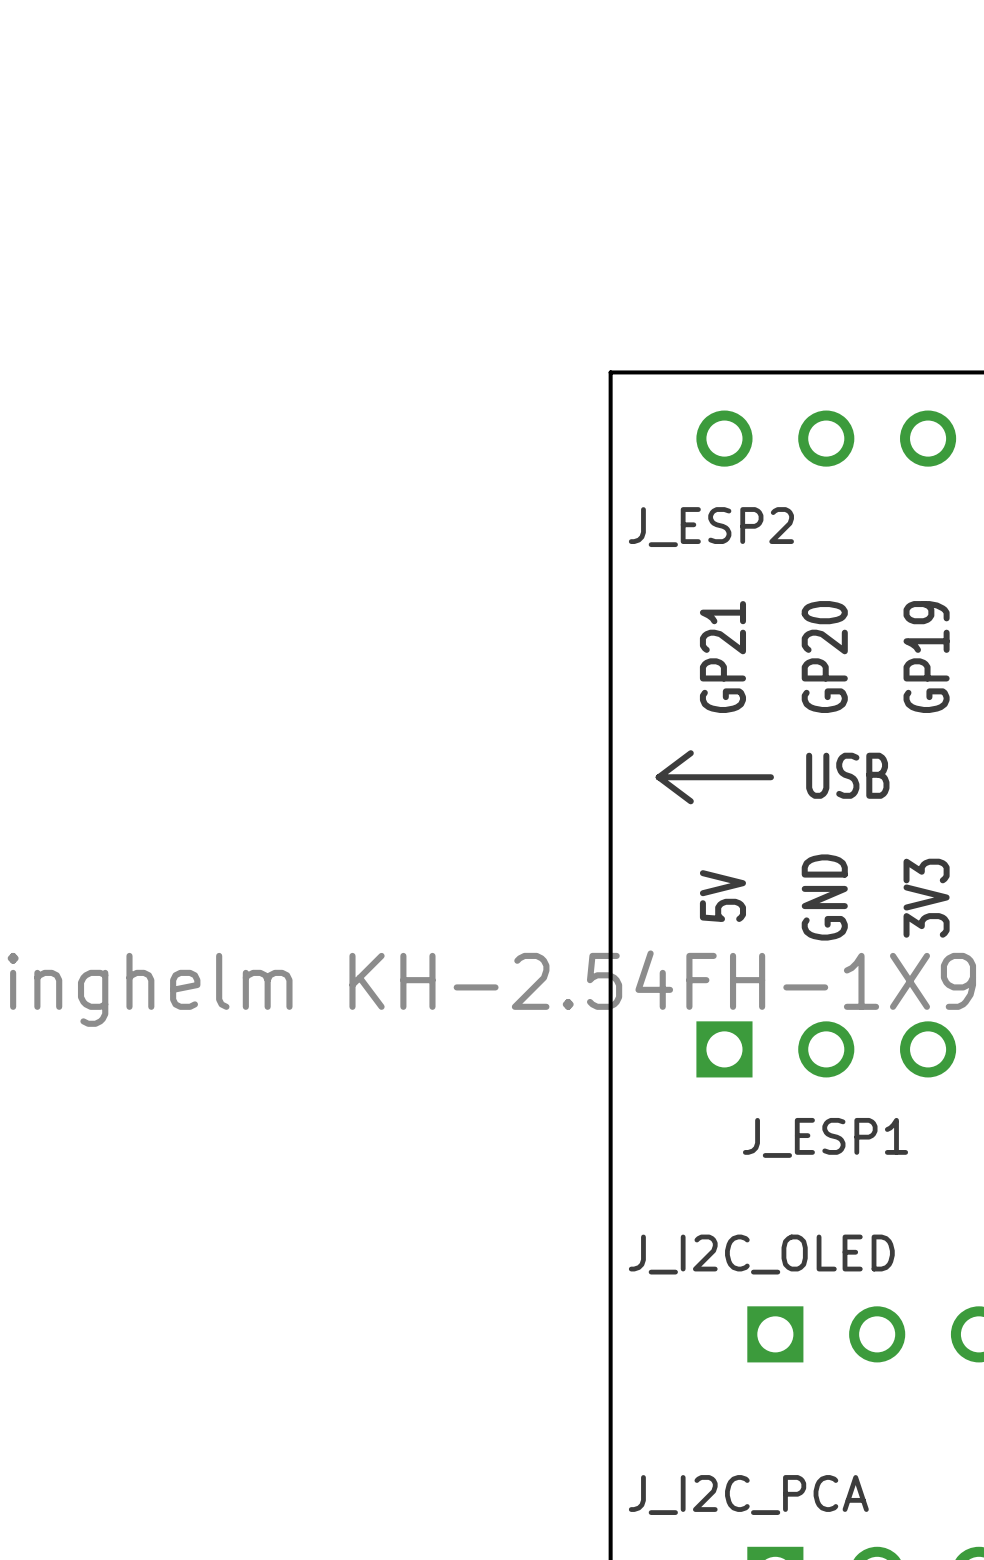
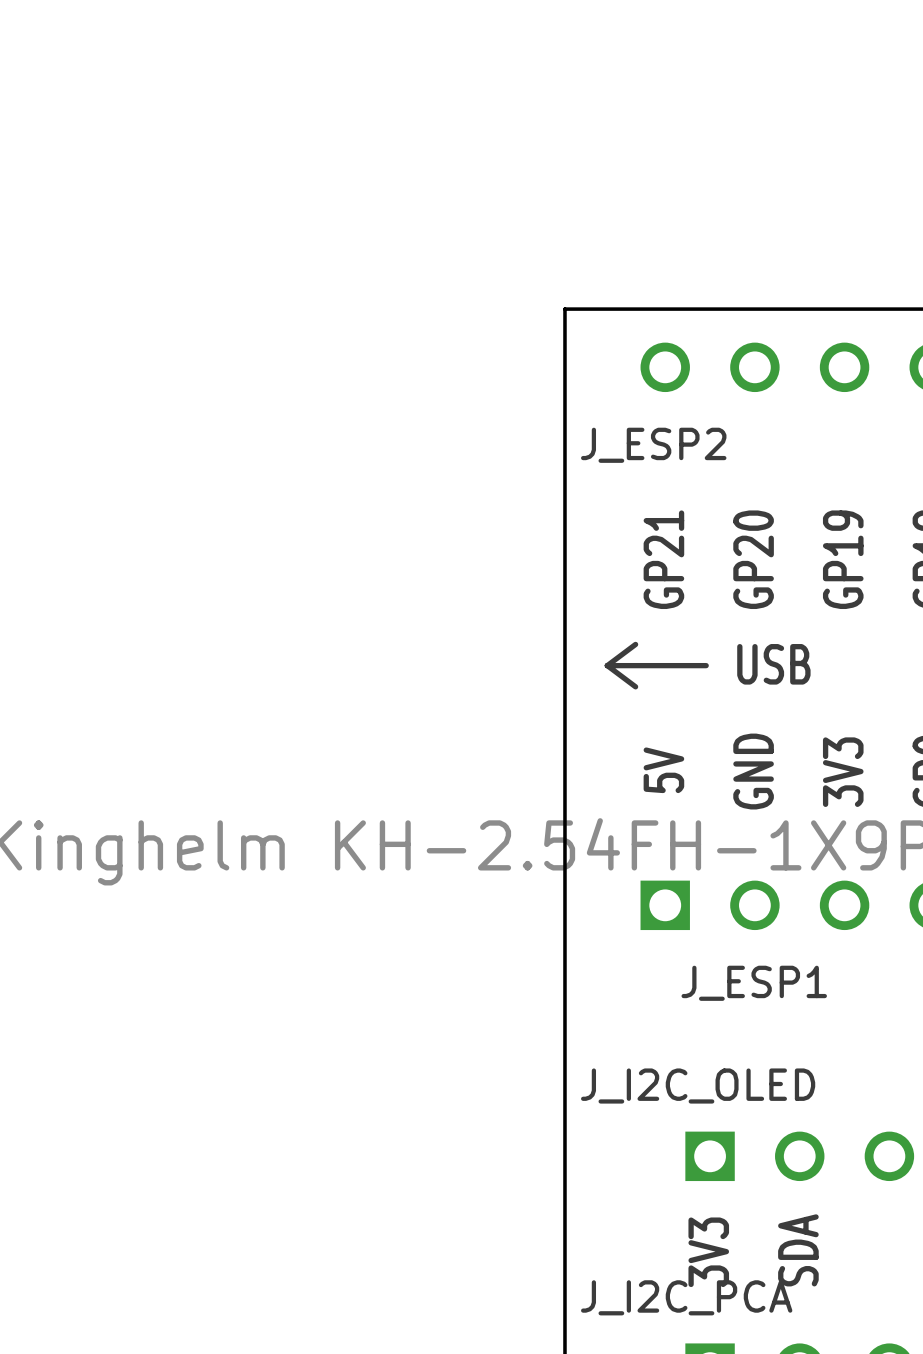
text: none -> SDA (798, 1250)
text: none -> 3V3 (708, 1252)

